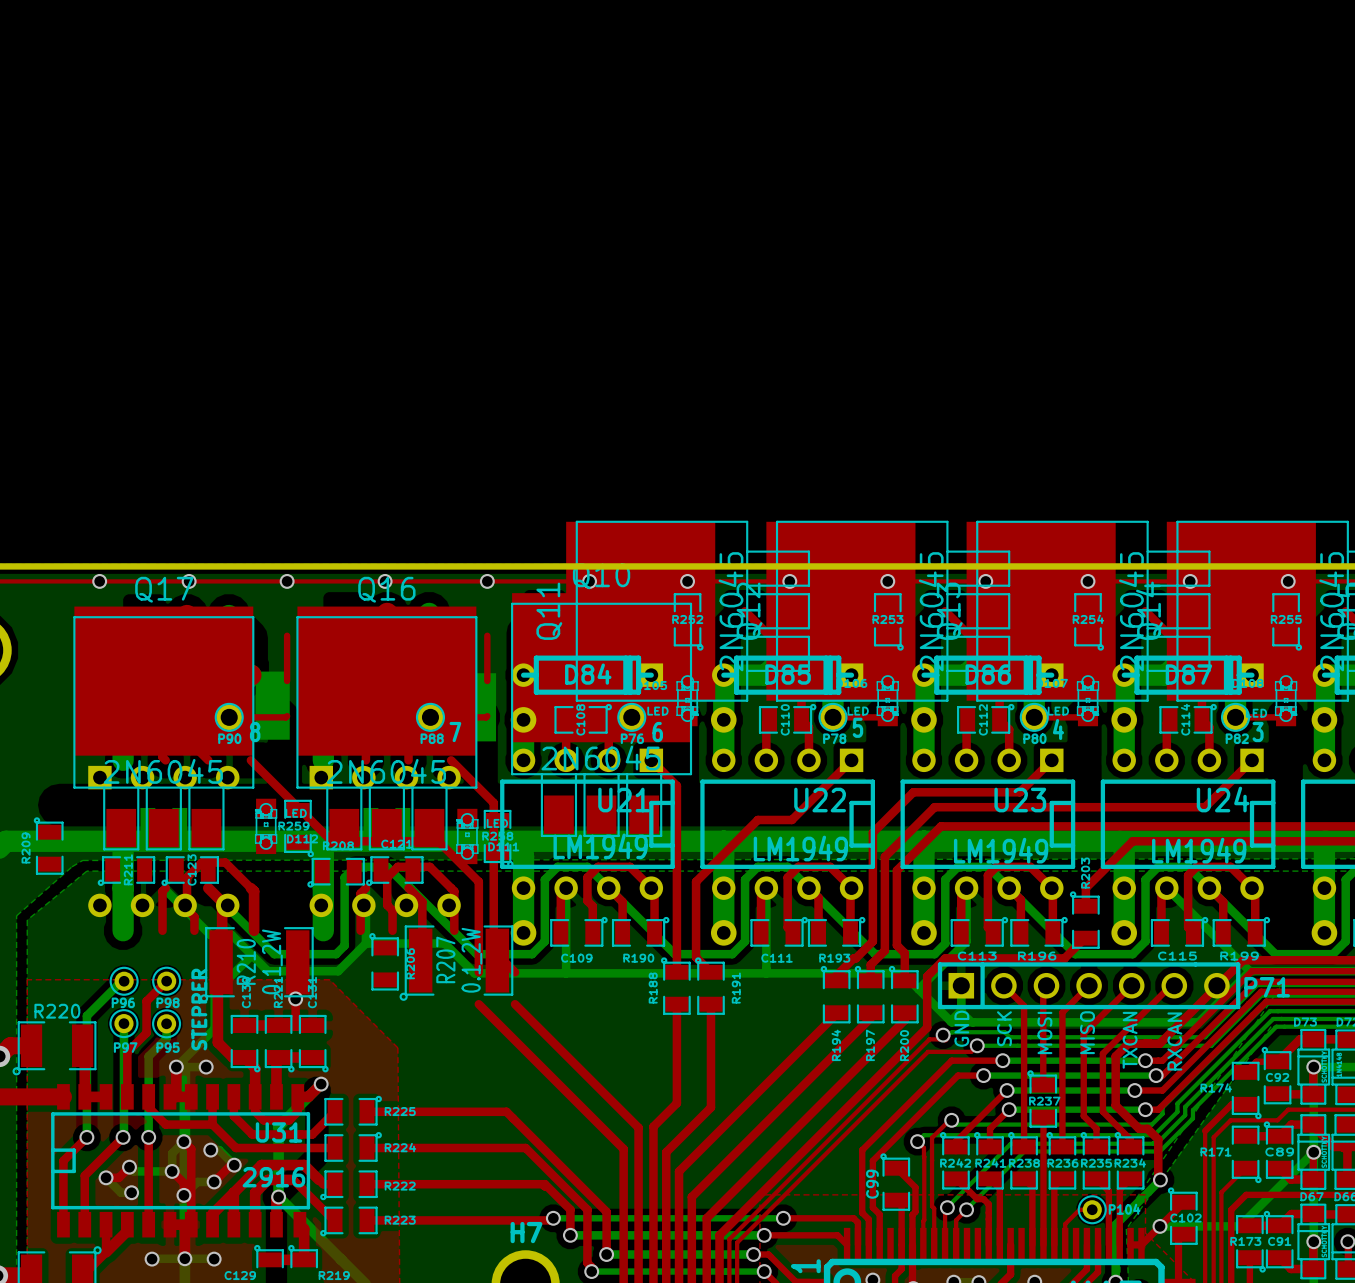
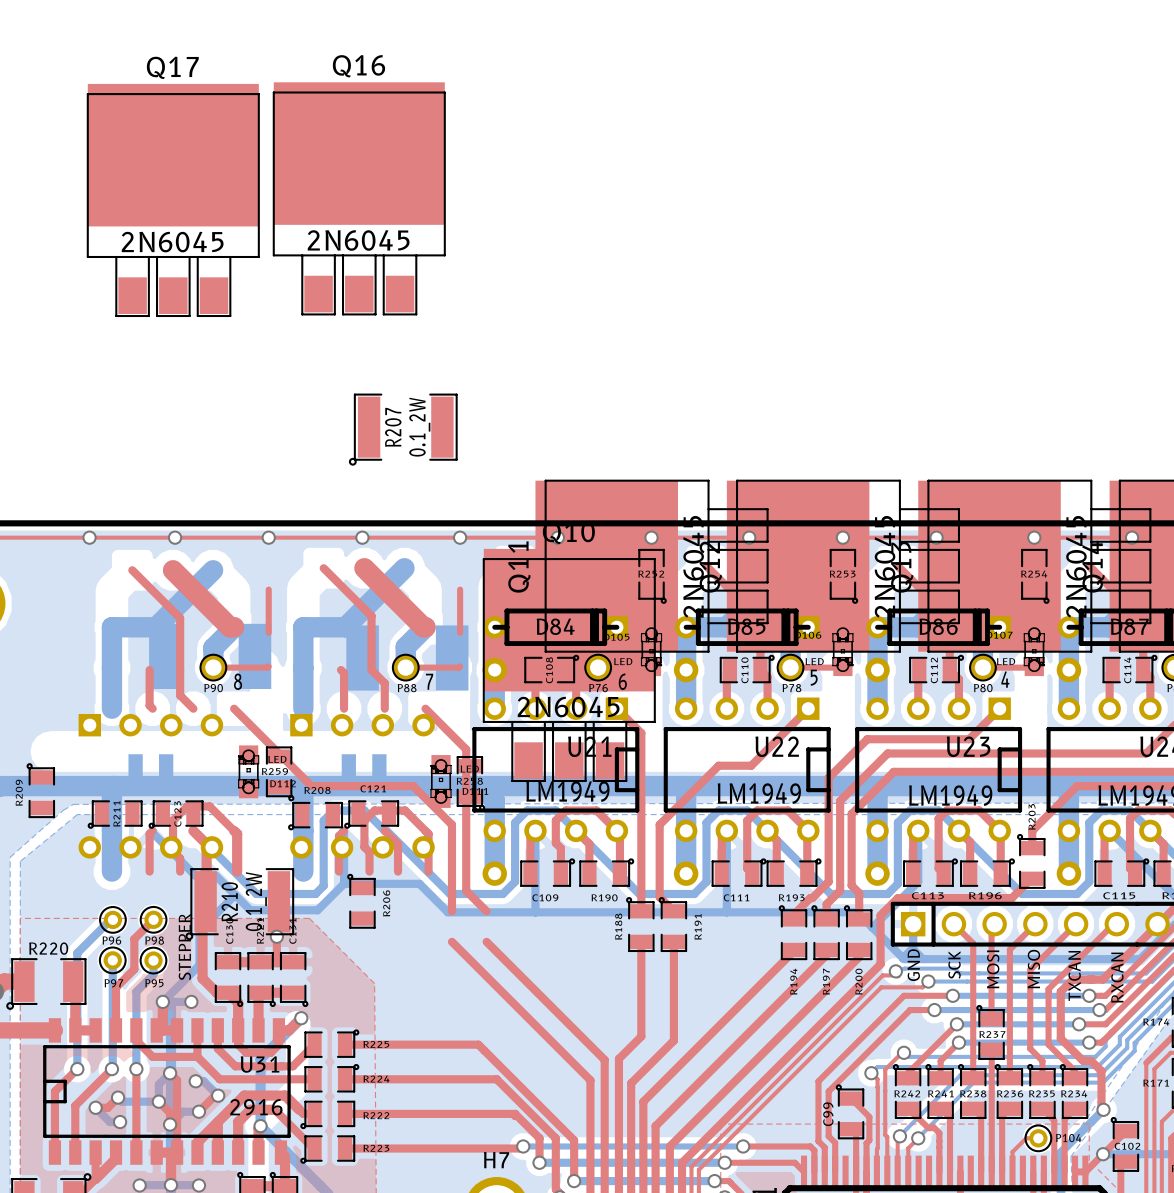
Q17 position: (163, 728) -> (173, 200)
Q16 position: (386, 728) -> (359, 198)
R207 position: (456, 963) -> (403, 429)

